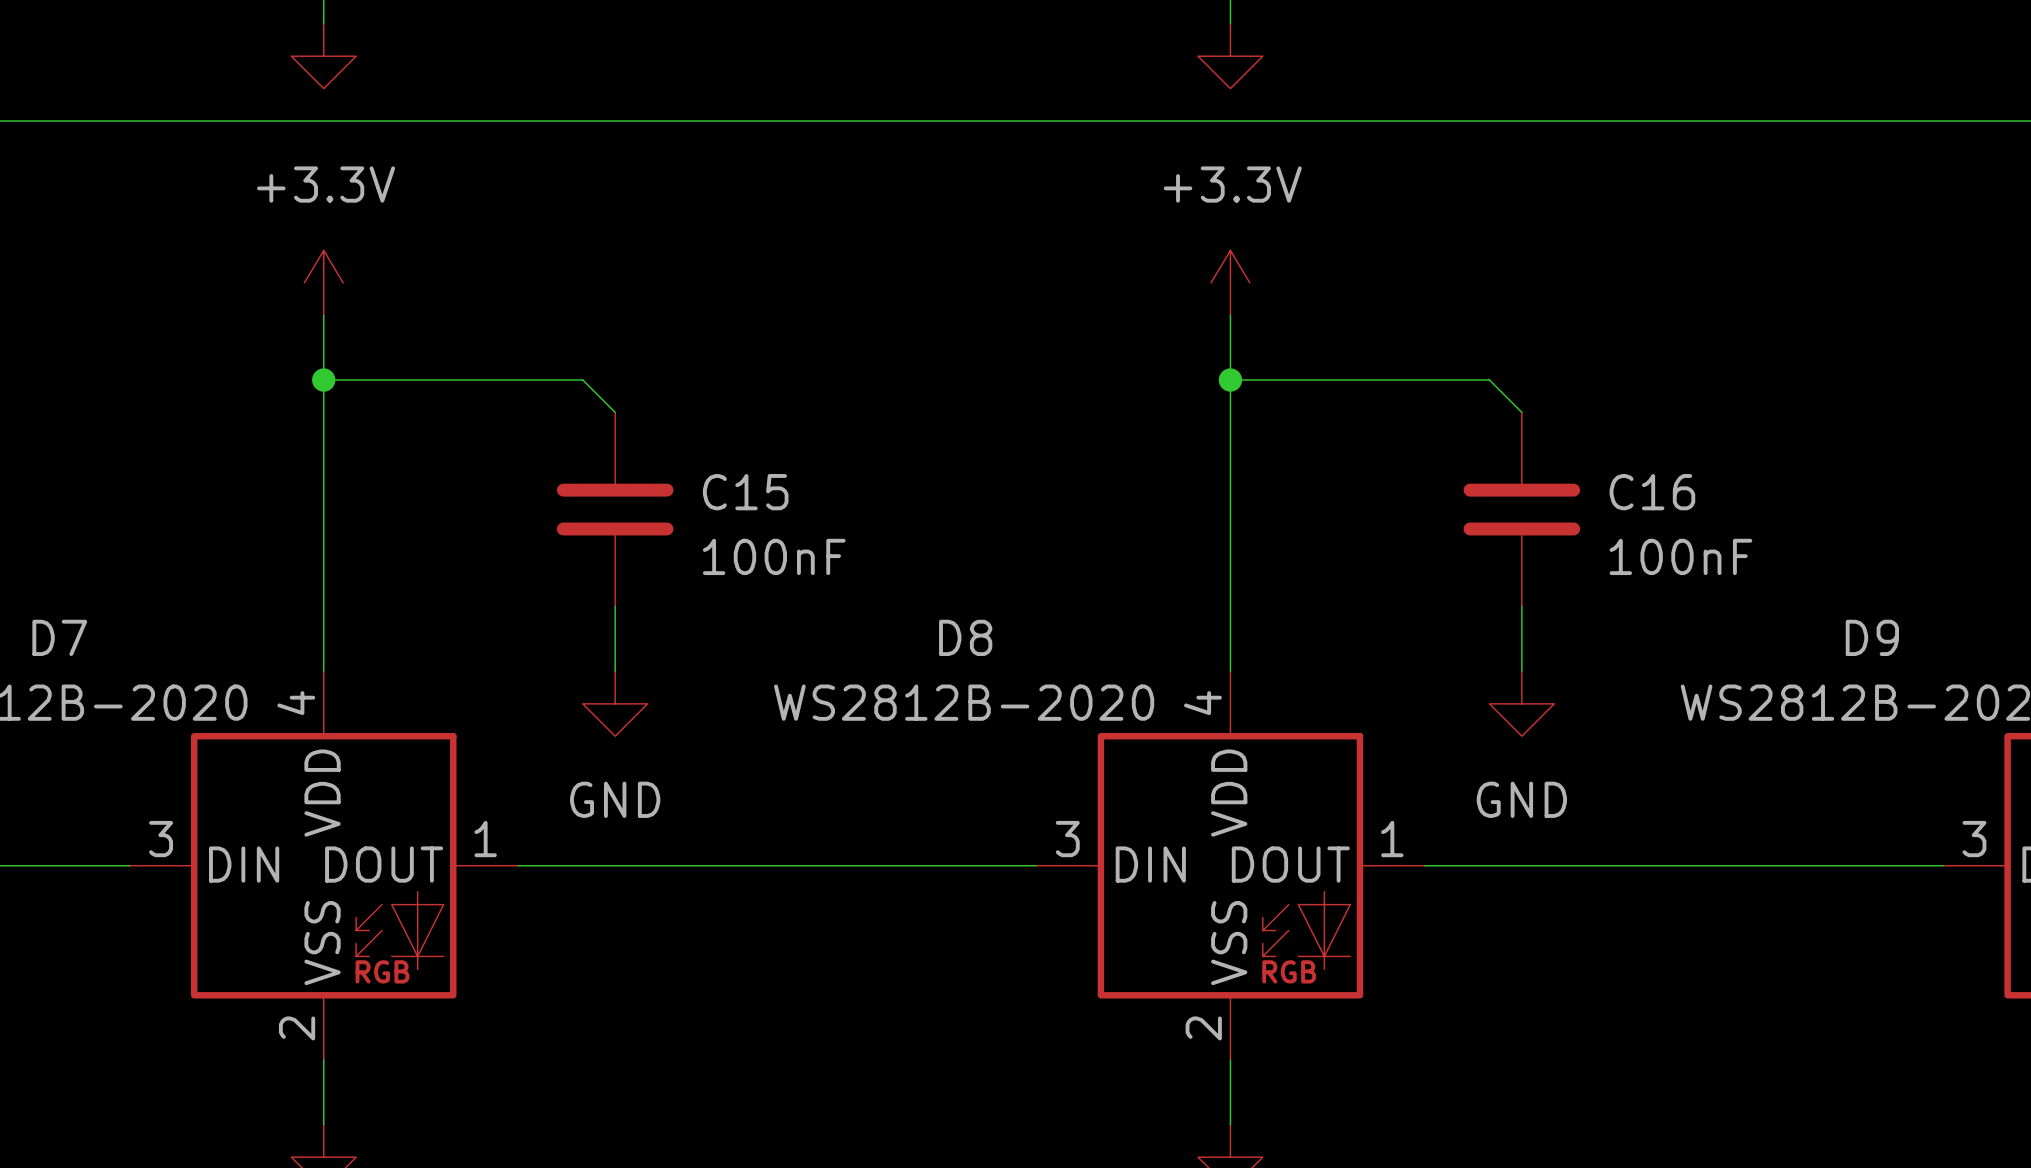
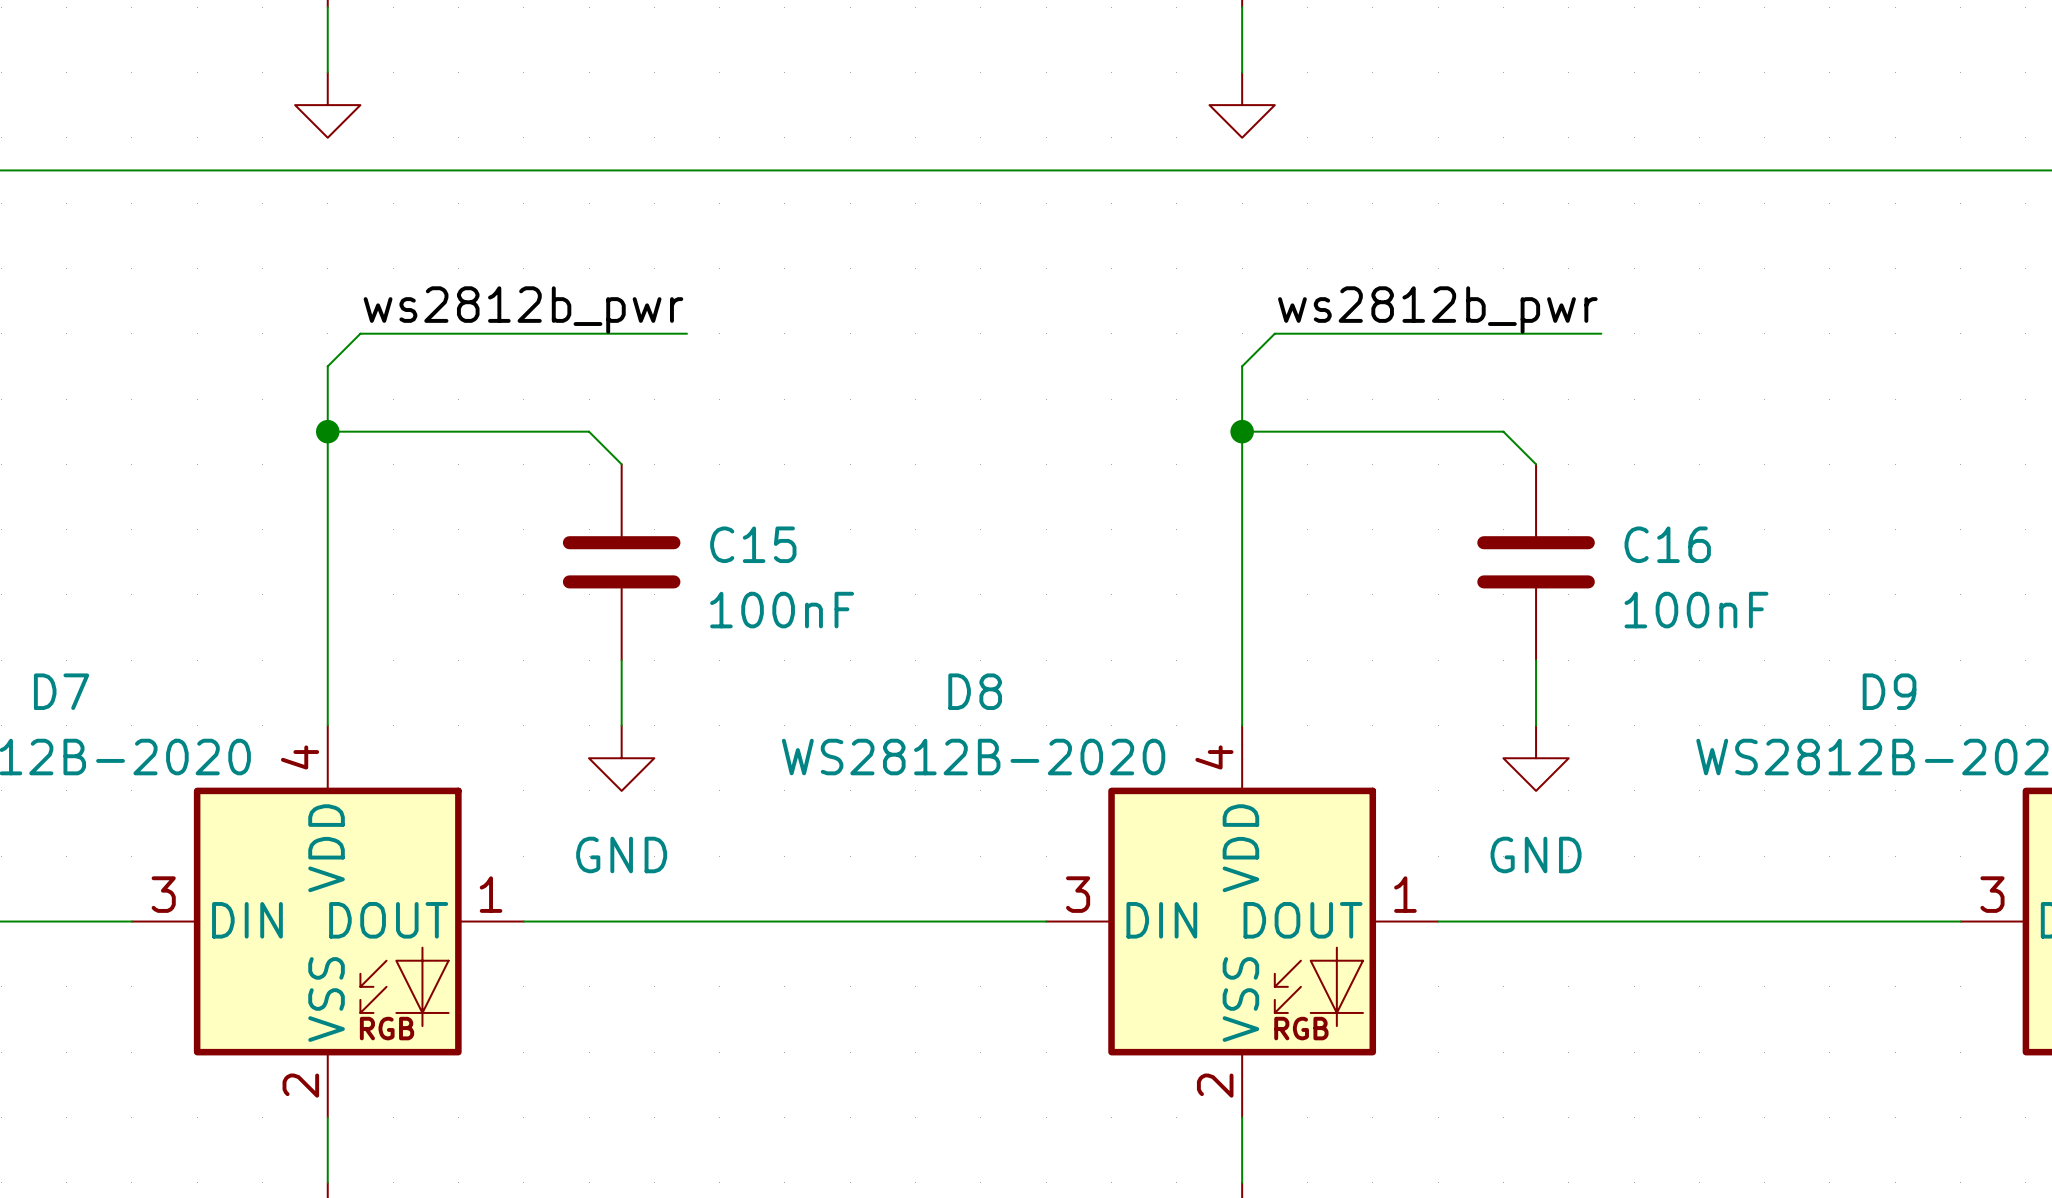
label: none -> ws2812b_pwr (523, 310)
label: none -> ws2812b_pwr (1437, 310)
power symbol: +3.3V (323, 282) -> none
wire: none -> (686, 333) (360, 333) (327, 366)
power symbol: +3.3V (1230, 282) -> none
wire: none -> (1601, 333) (1274, 333) (1242, 366)

